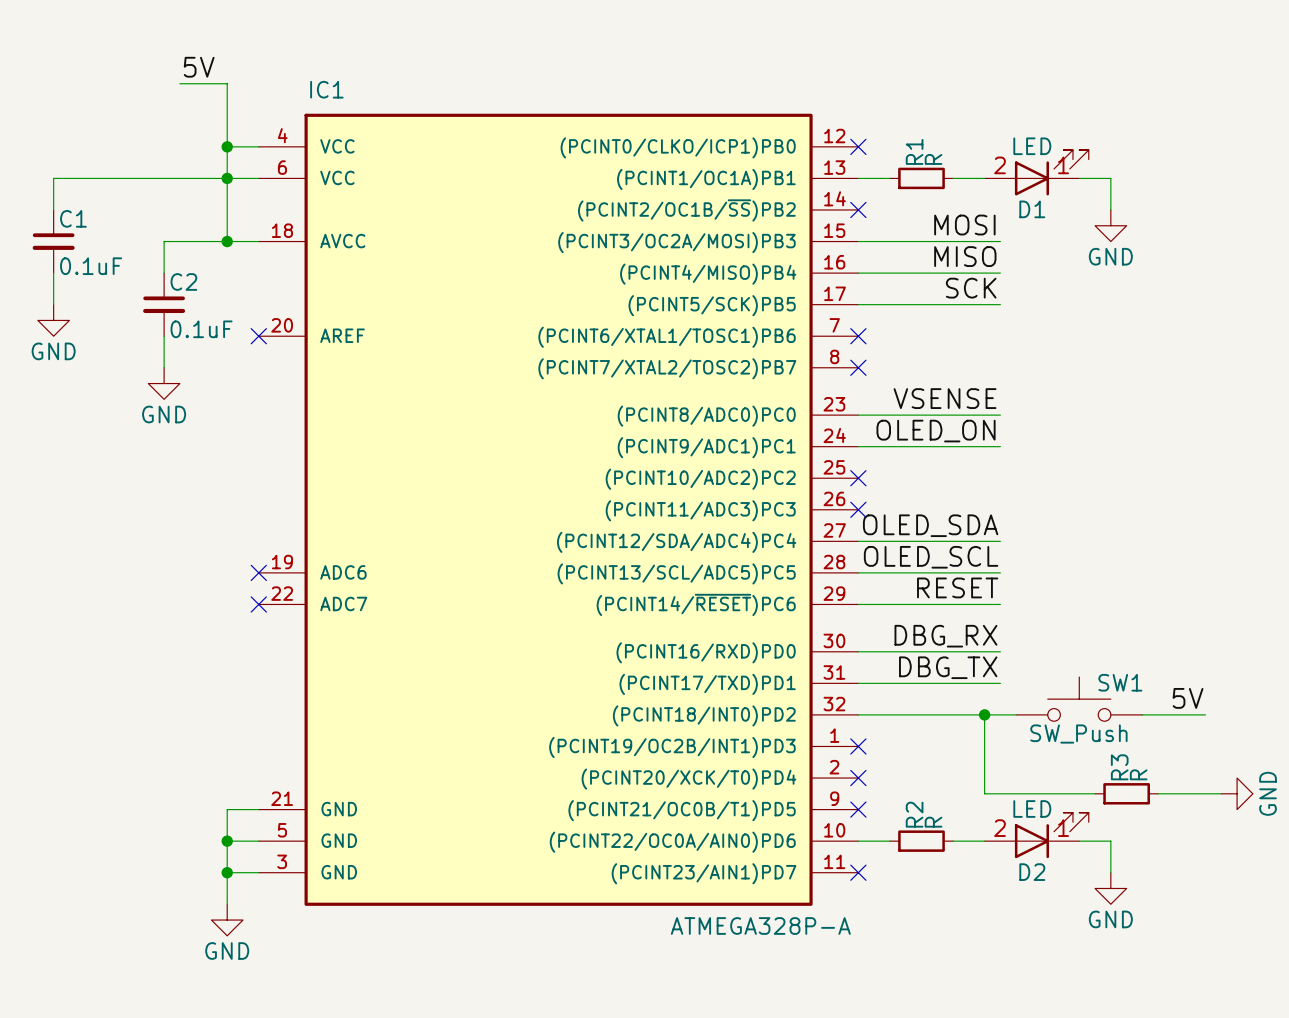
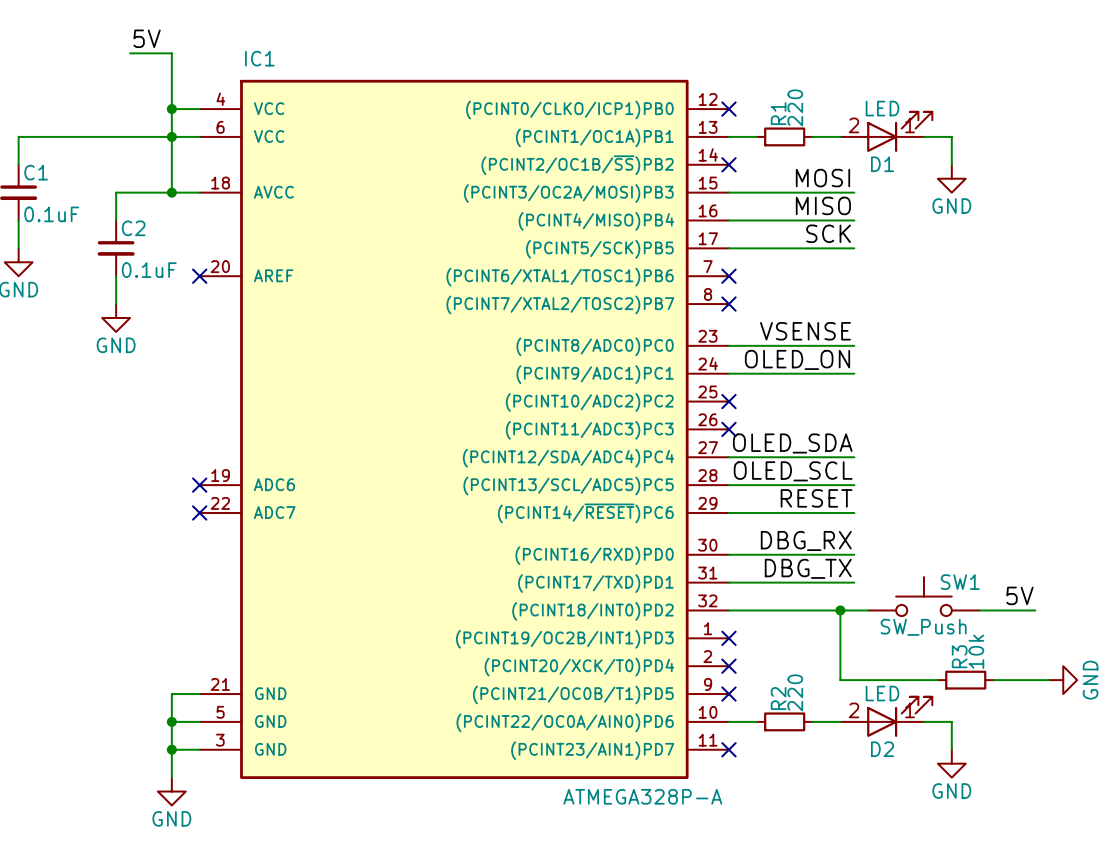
R1 value: R (933, 159) -> 220 (795, 107)
R3 value: R (1138, 774) -> 10k (976, 651)
R2 value: R (933, 822) -> 220 (795, 692)

